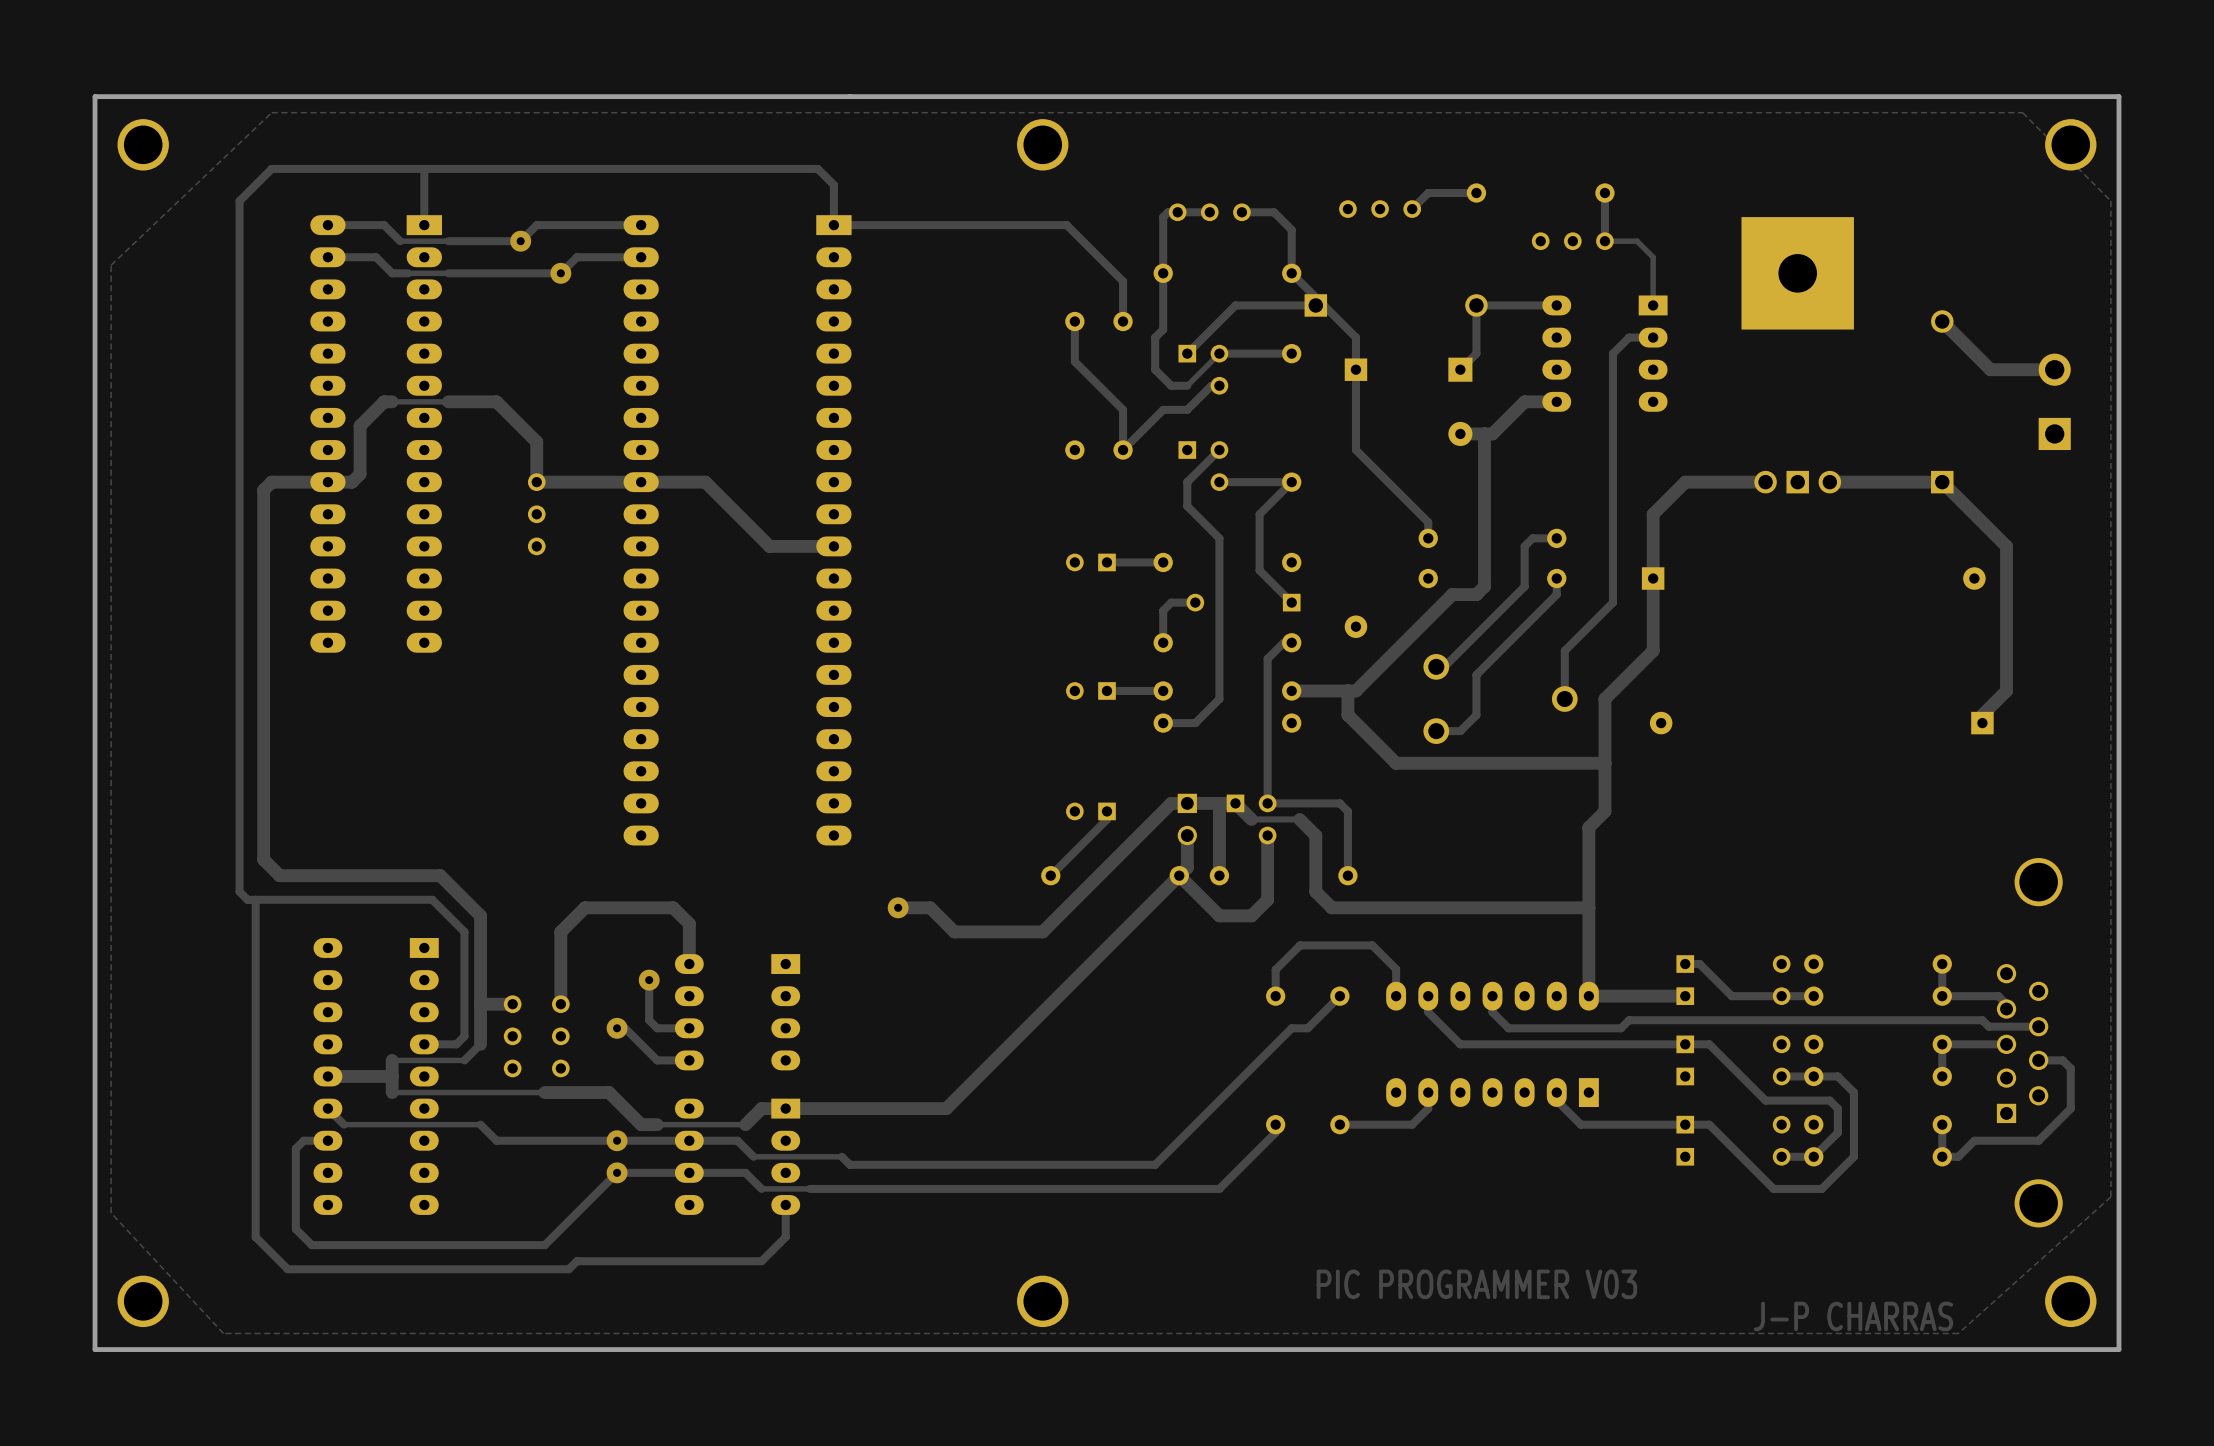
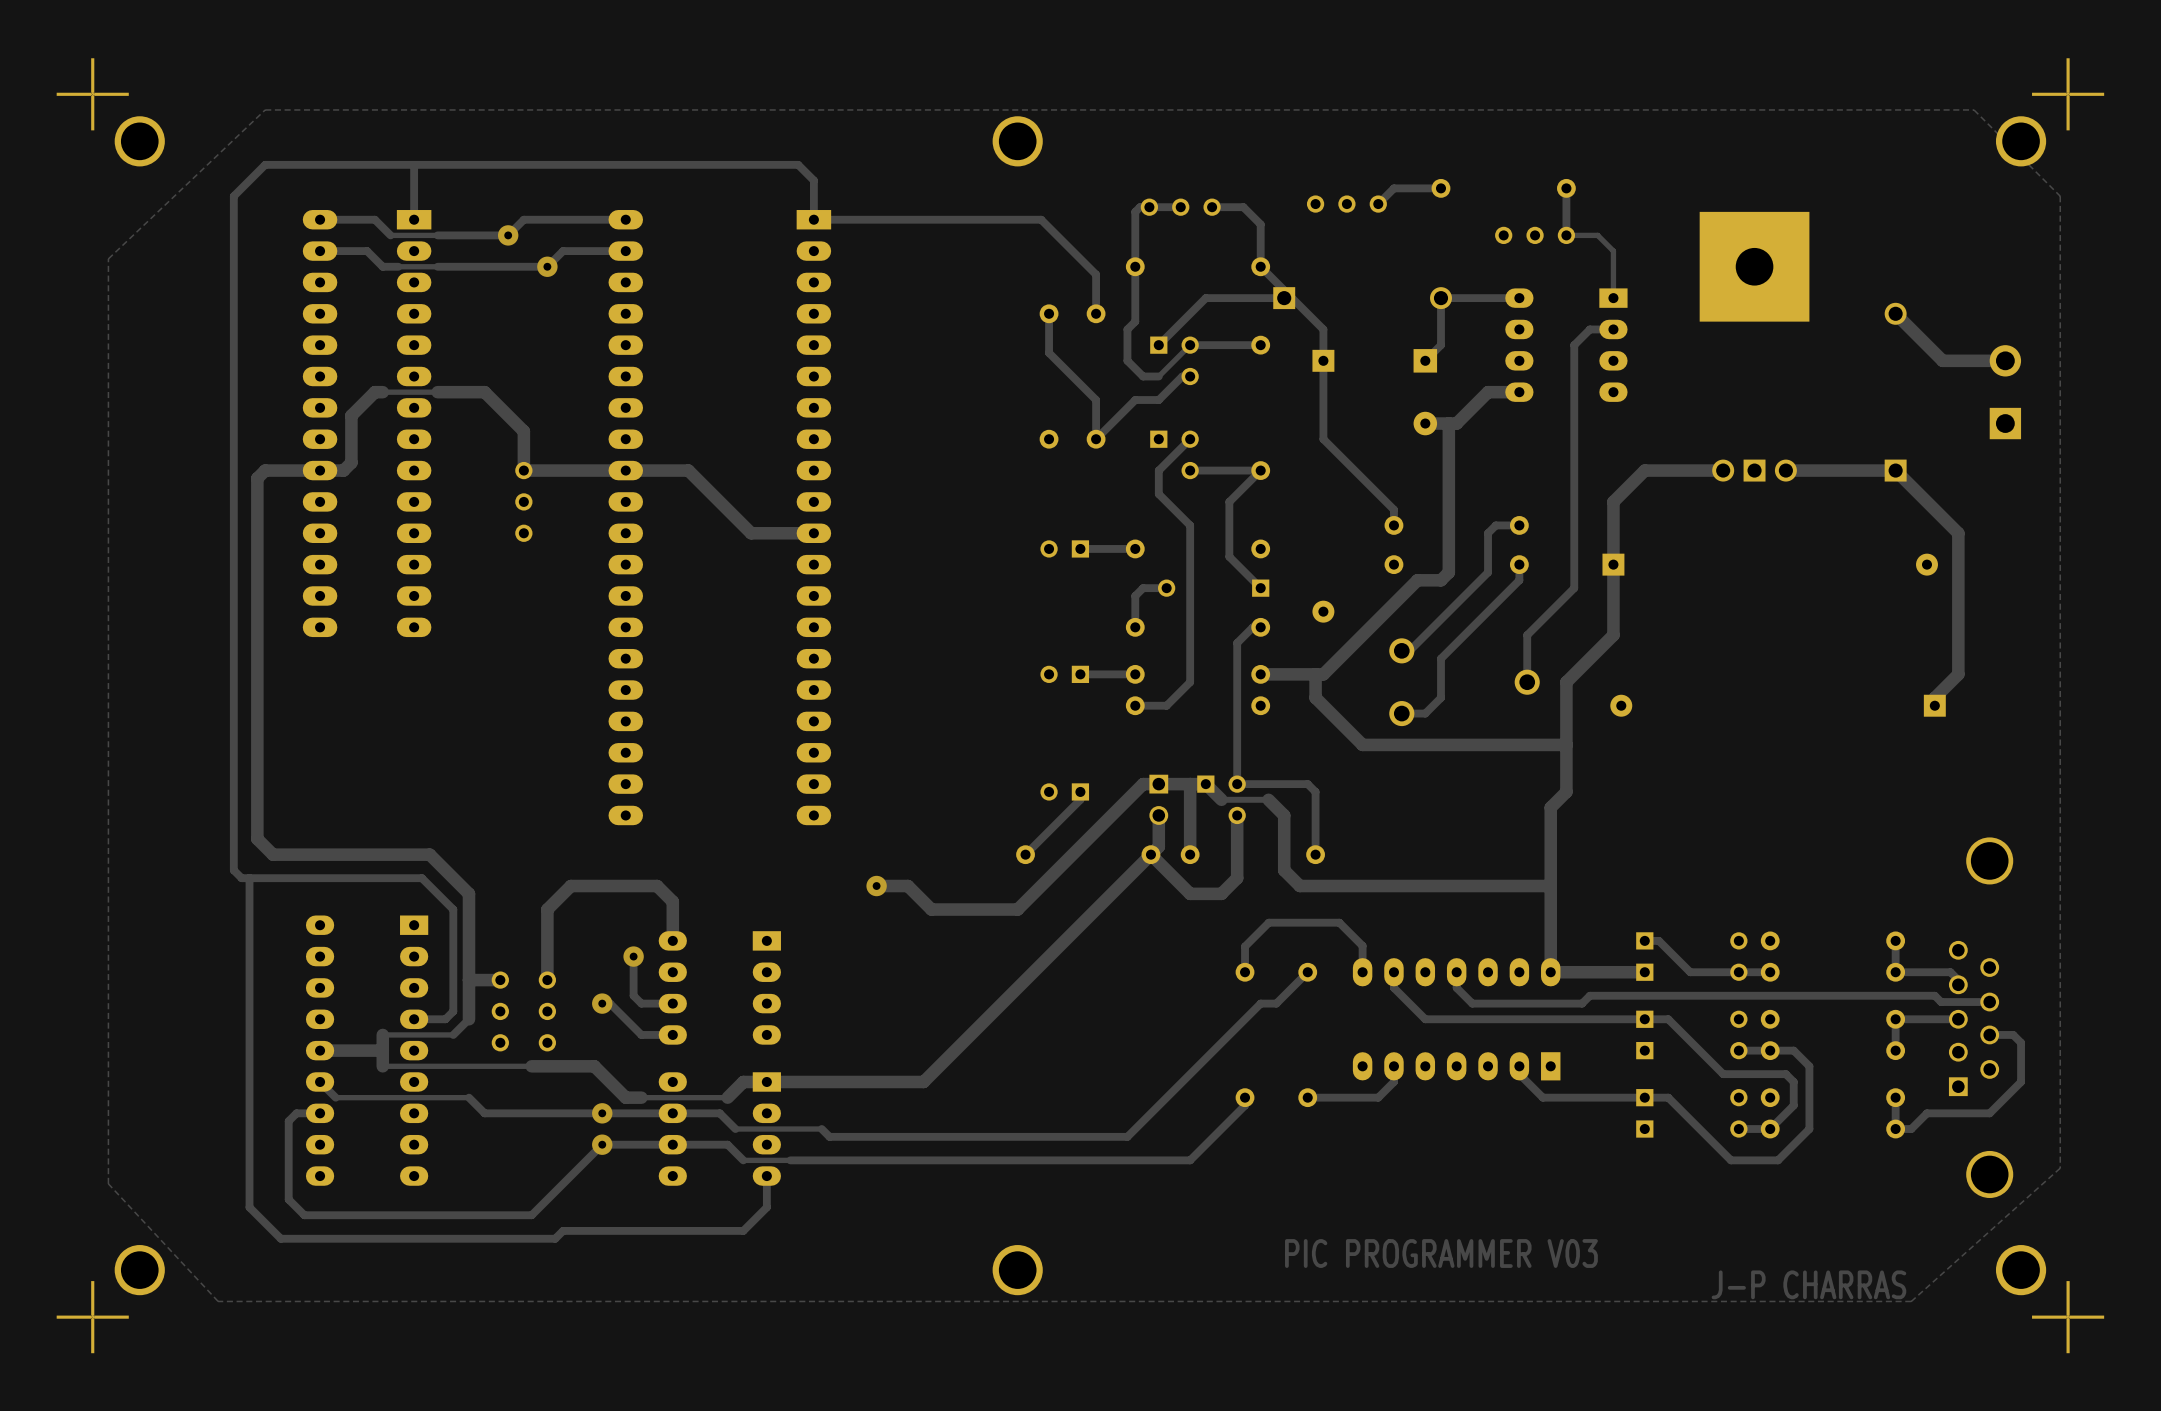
part: none -> (92, 94)
board edge: (2118, 96) (2118, 1349) (95, 1349) (95, 96) (2118, 96) -> none
part: none -> (2068, 94)
part: none -> (92, 1317)
part: none -> (2068, 1317)

